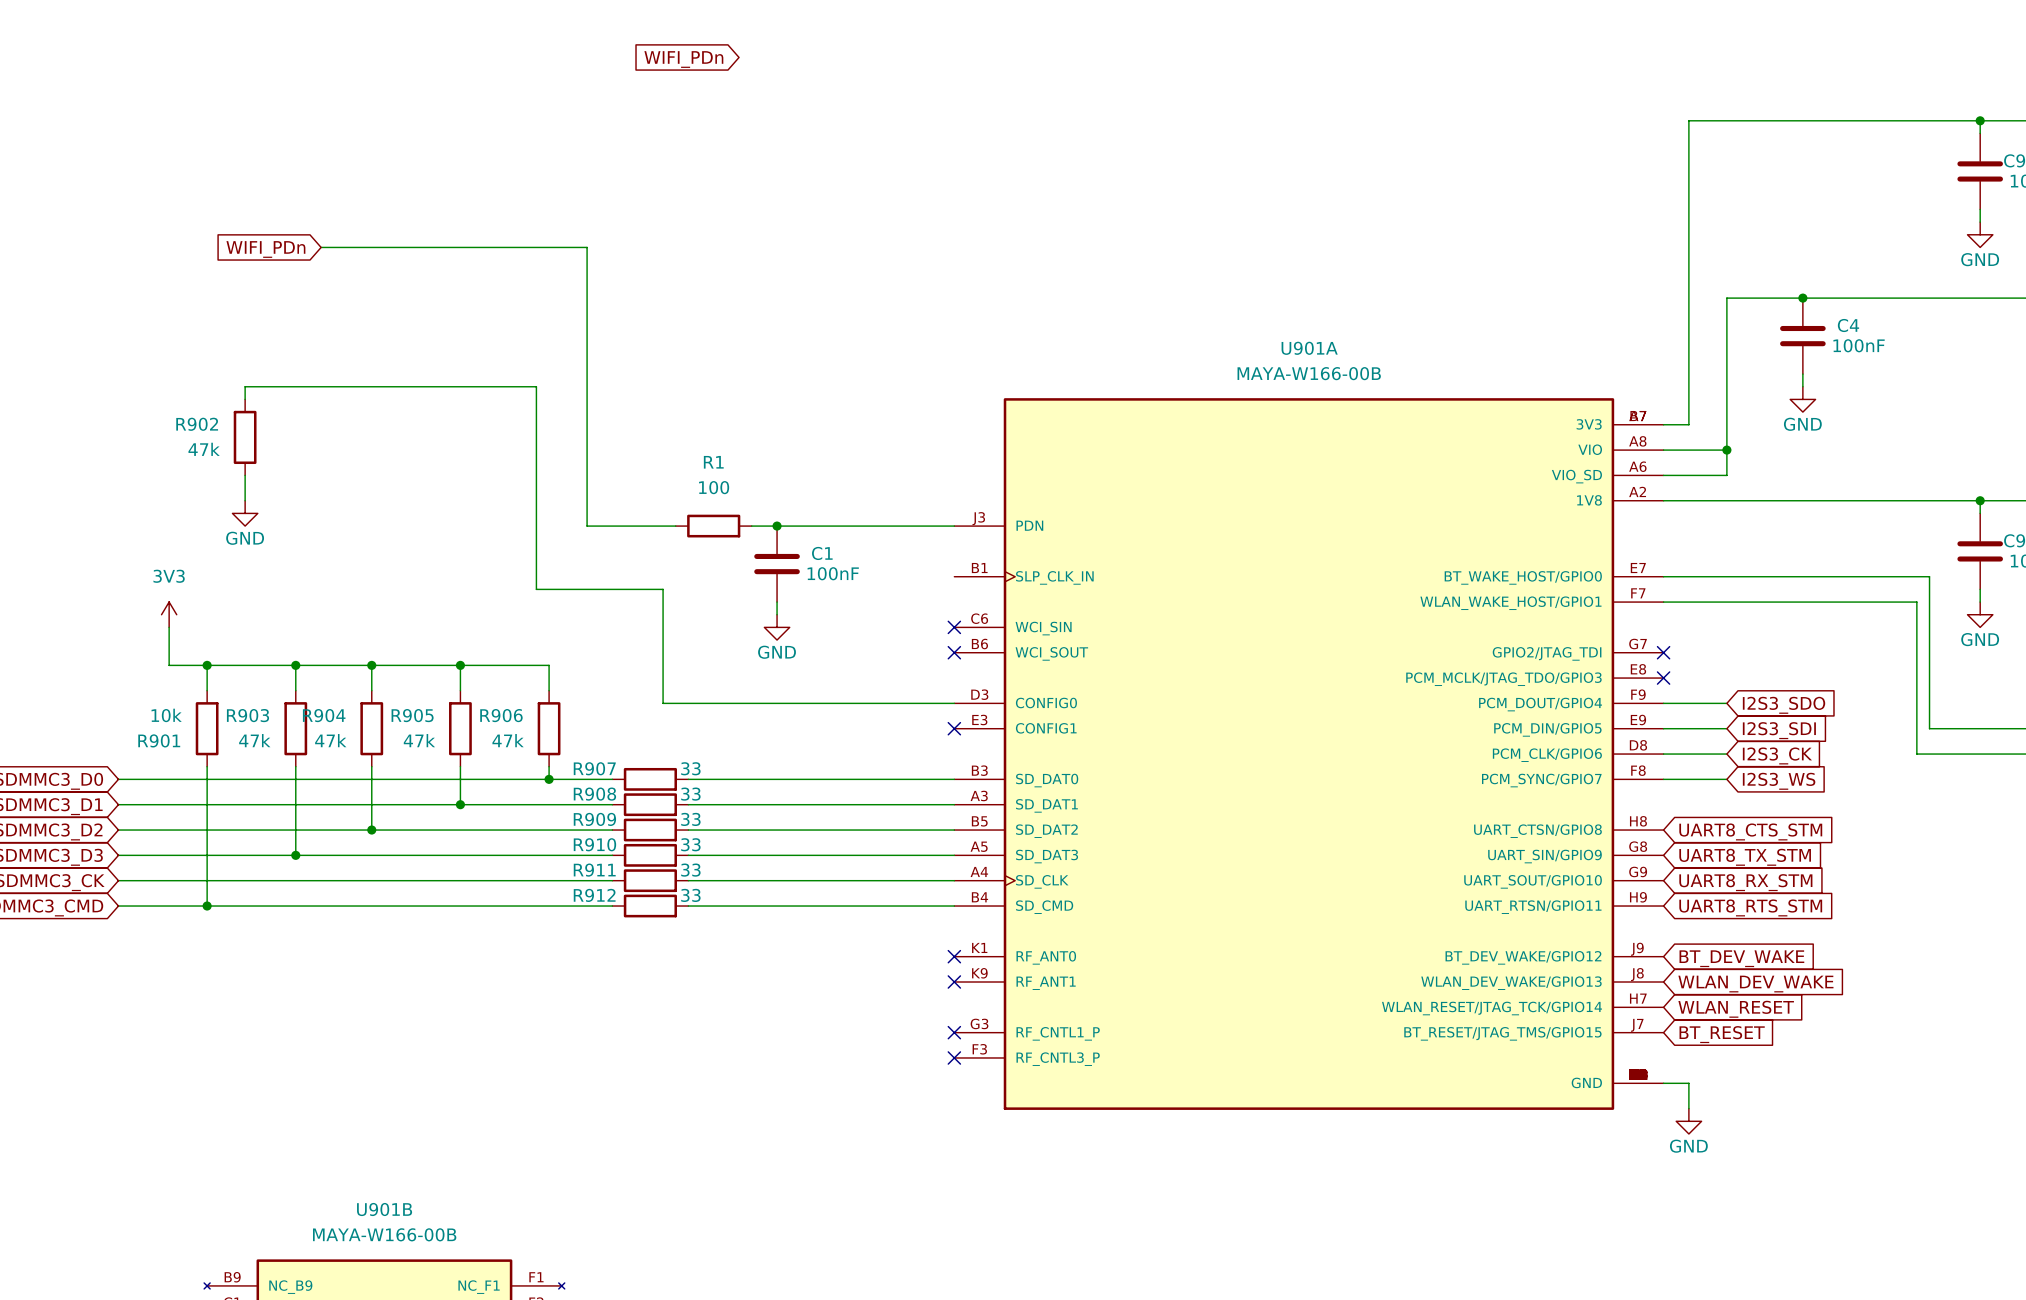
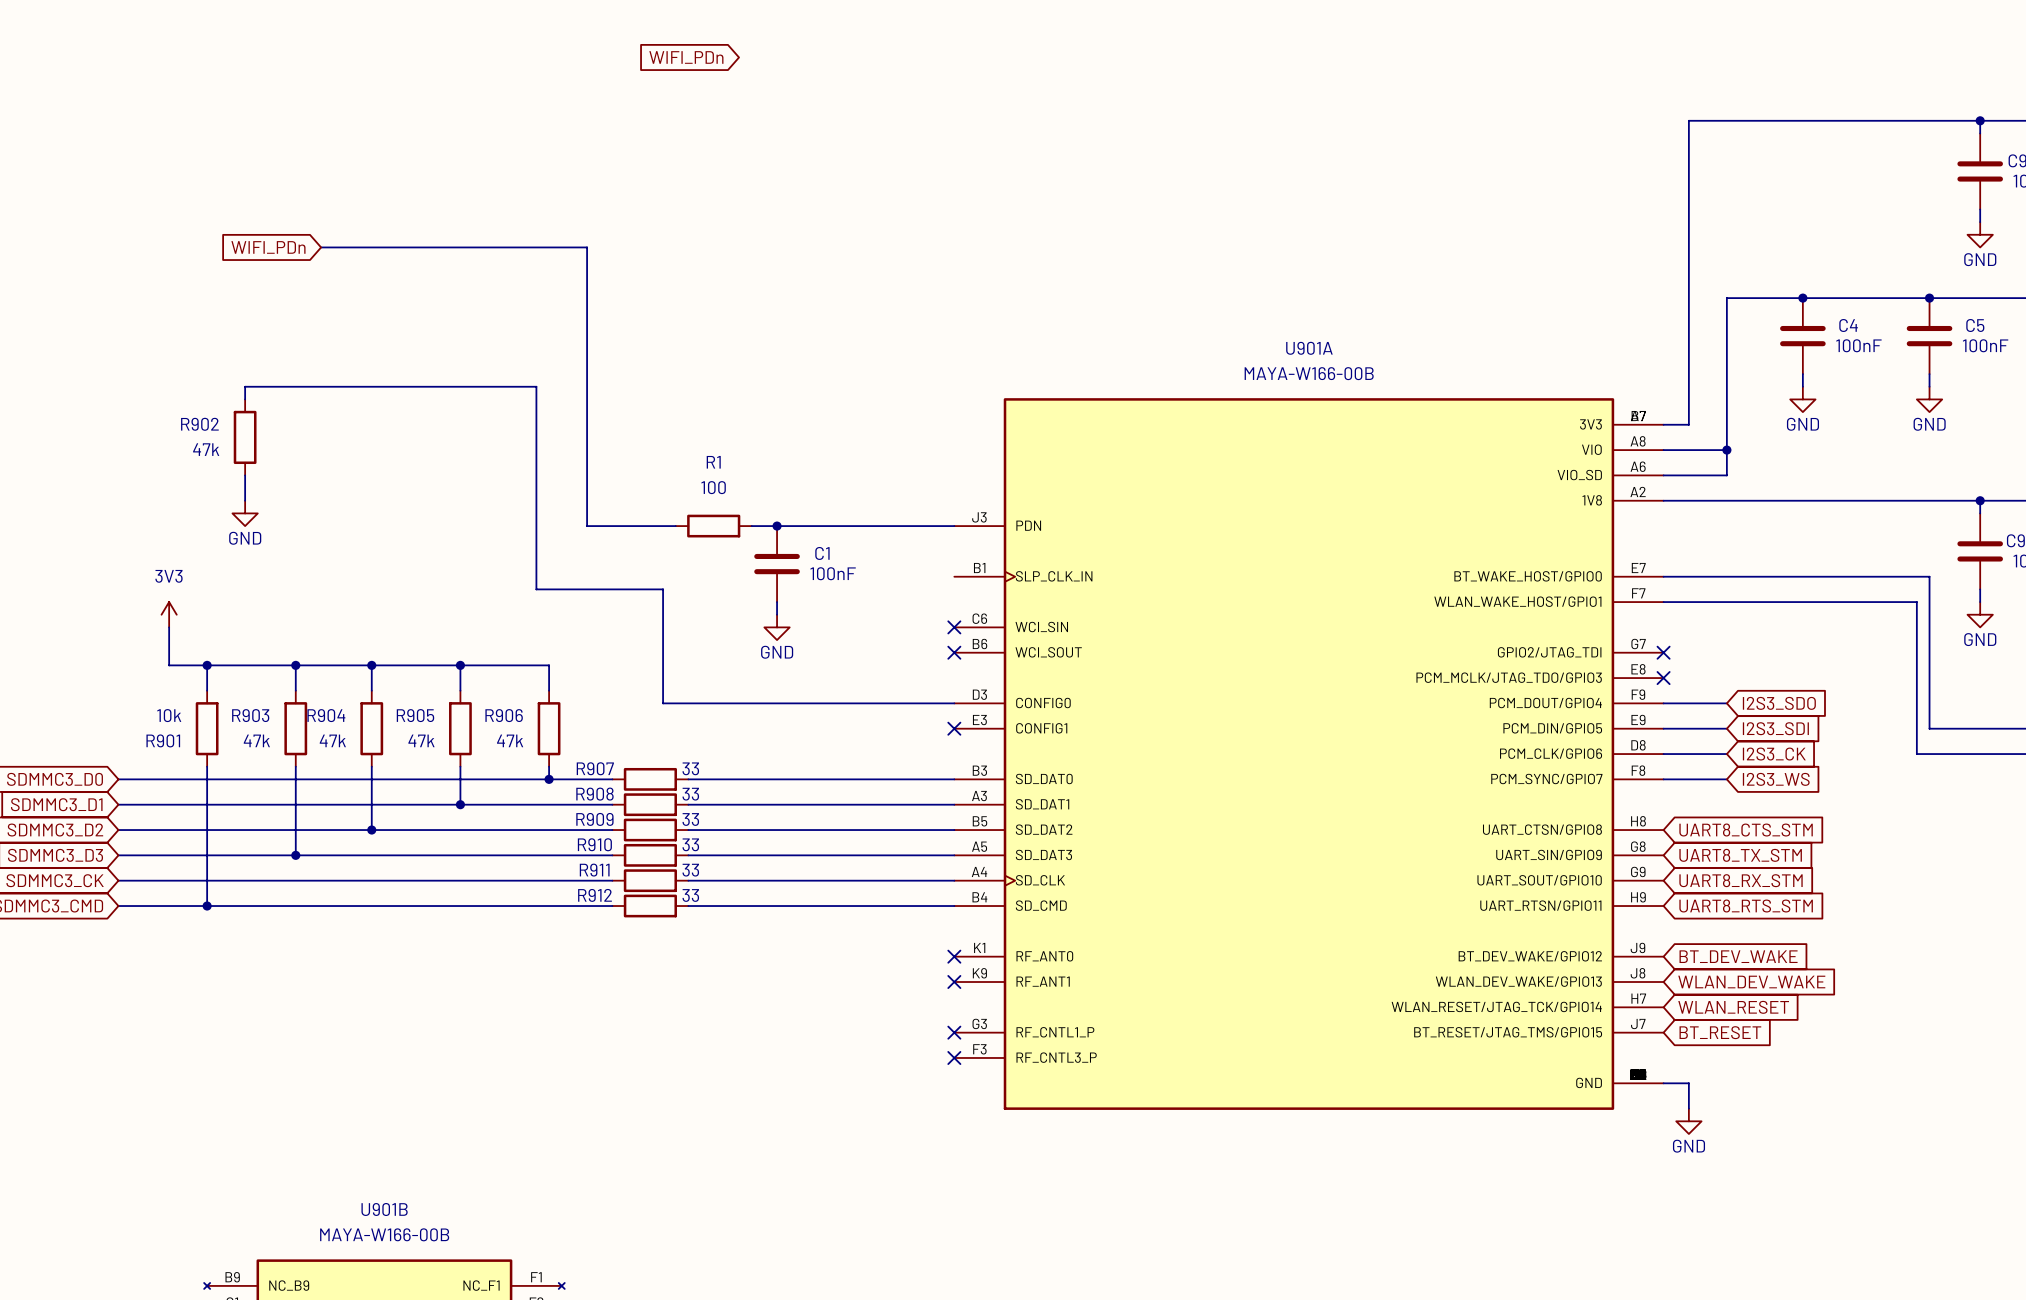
junction: none -> (1929, 298)
C5: none -> 100nF (1929, 336)
wire: none -> (1929, 374) (1929, 386)
power symbol: none -> GND (1929, 399)

